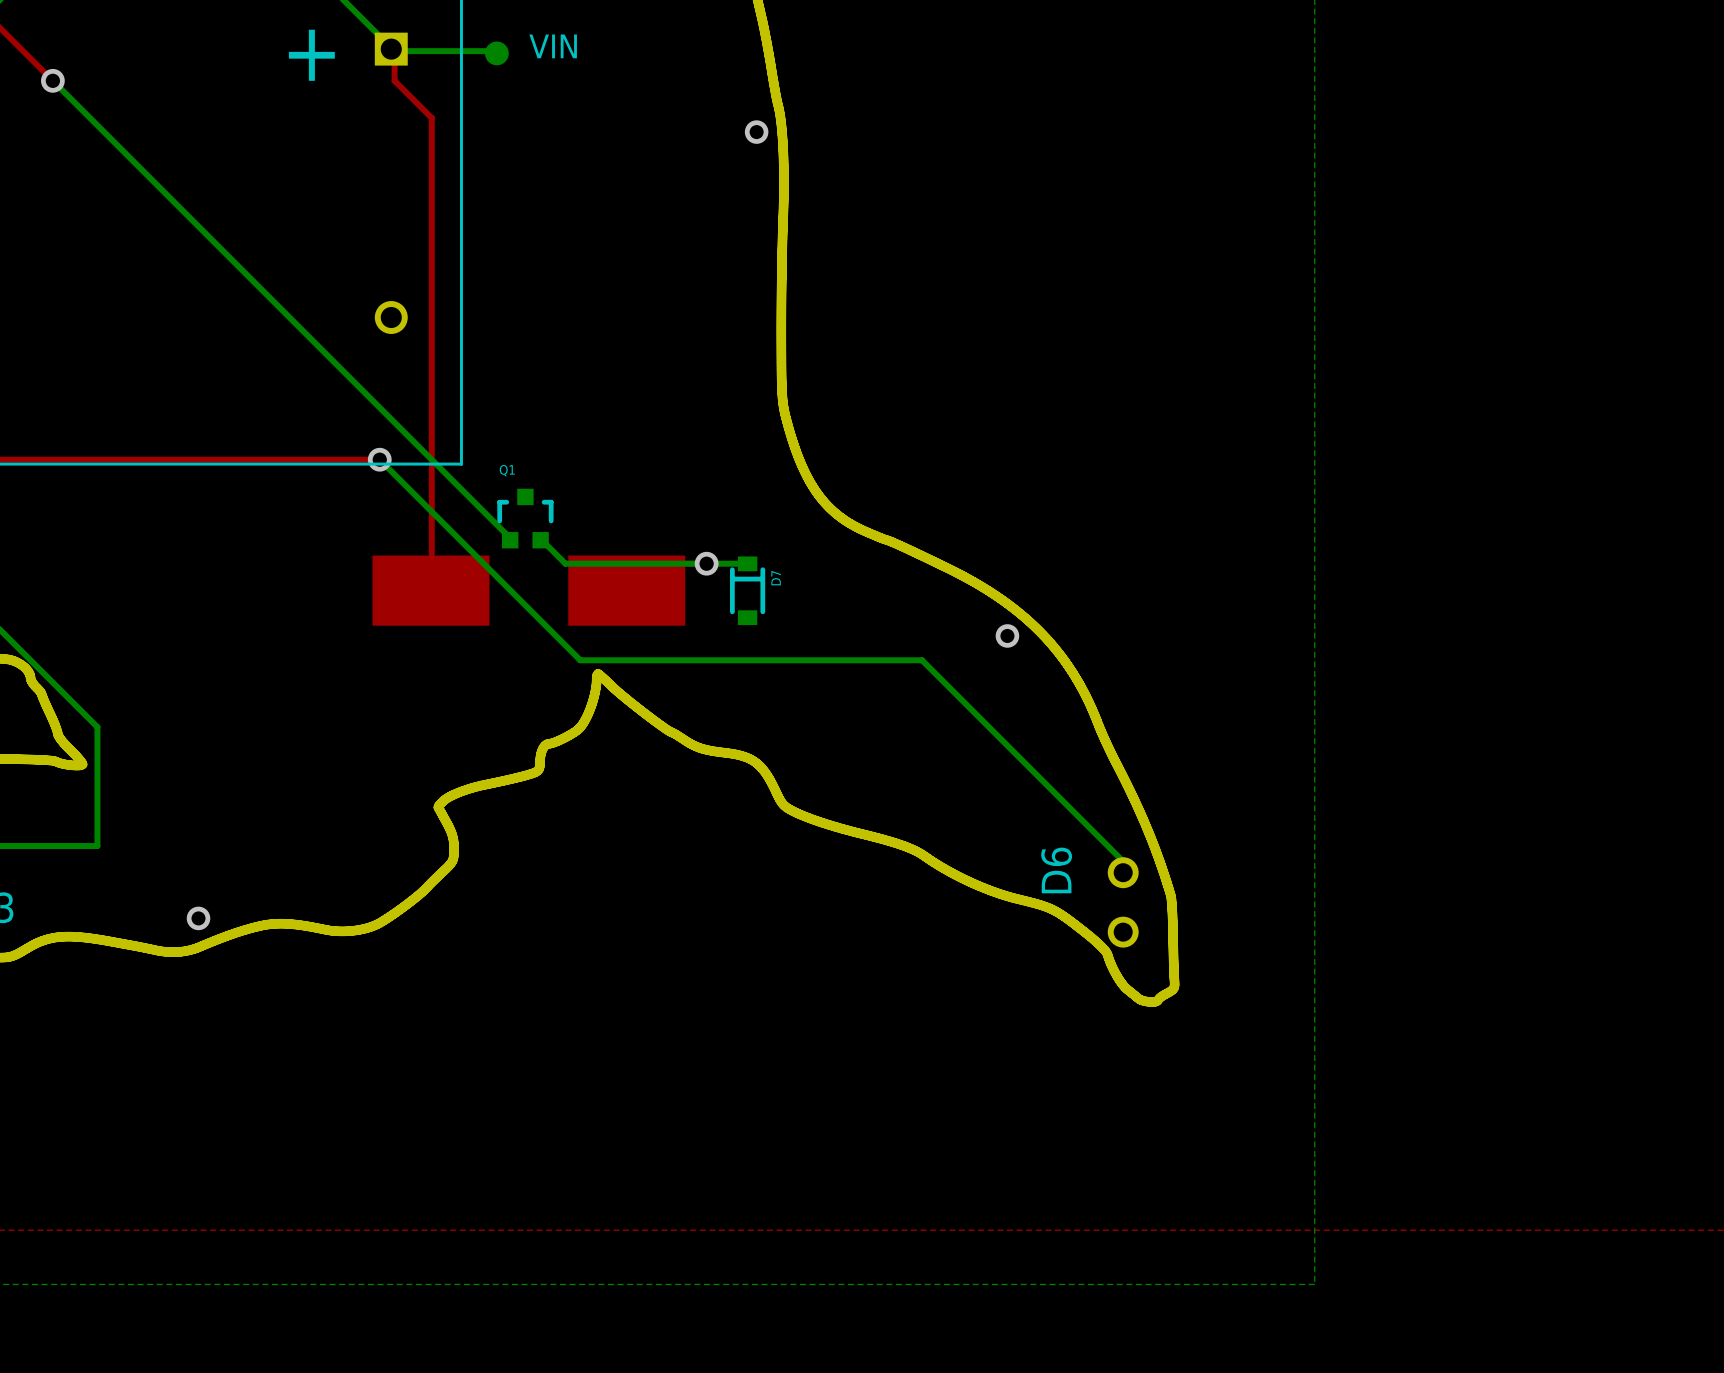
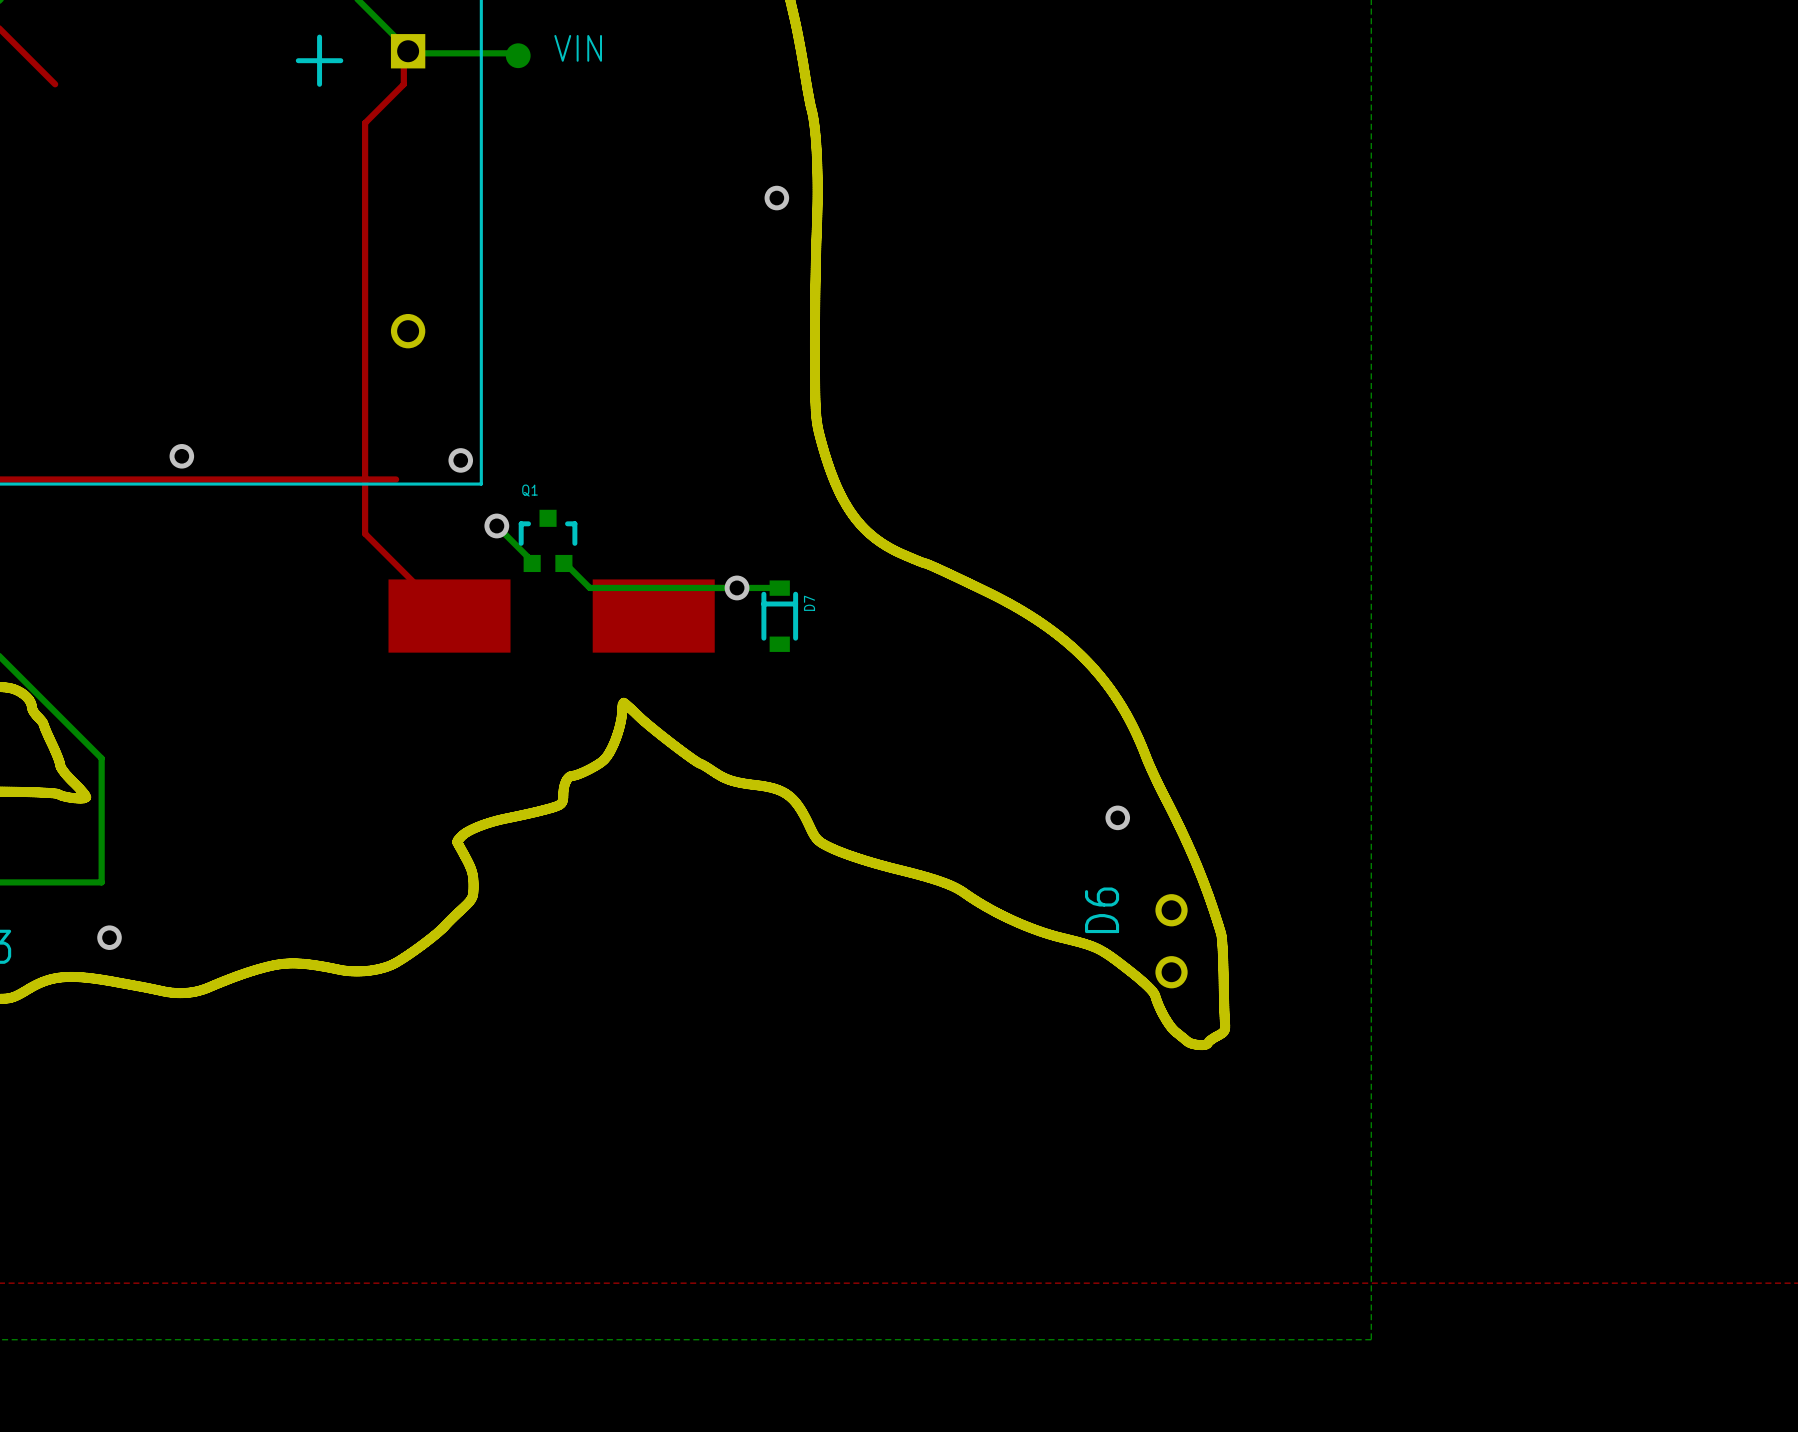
top track: (391, 49) (394, 51) (394, 80) (431, 117) (430, 590) -> (408, 51) (403, 53) (403, 84) (365, 123) (365, 533) (449, 616)
bottom track: (52, 80) (476, 504) -> none
via: (52, 80) -> none
via position: (756, 132) -> (776, 198)
via: none -> (181, 456)
via: none -> (460, 460)
bottom track: (379, 459) (580, 660) (922, 660) (1130, 868) (1123, 872) -> none
via position: (379, 459) -> (496, 525)
via: (1007, 635) -> none
via: none -> (1117, 817)
via position: (198, 918) -> (109, 937)

